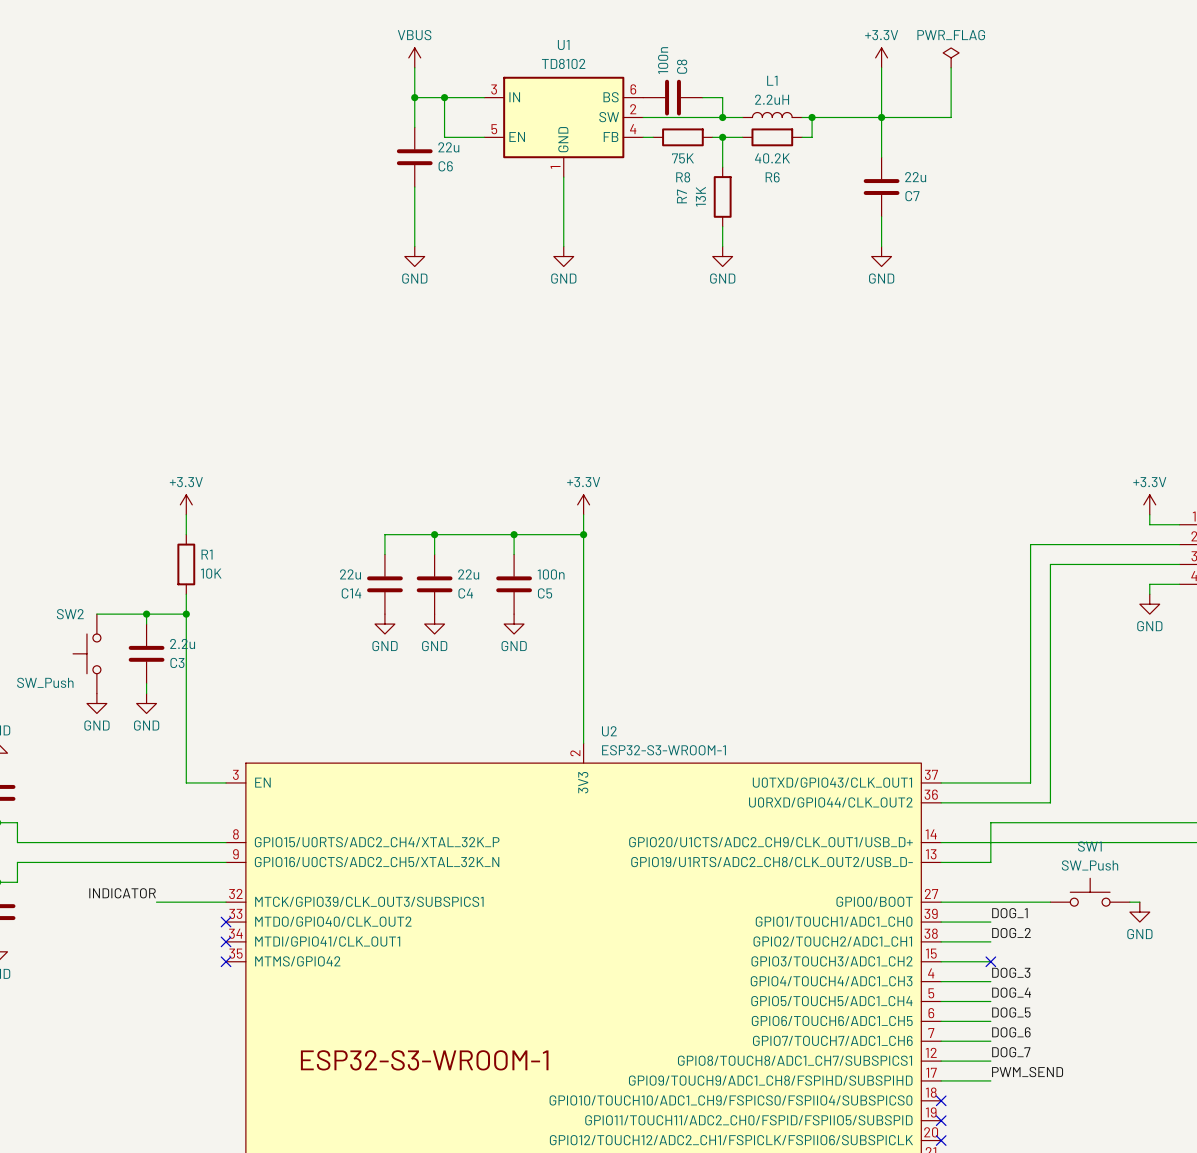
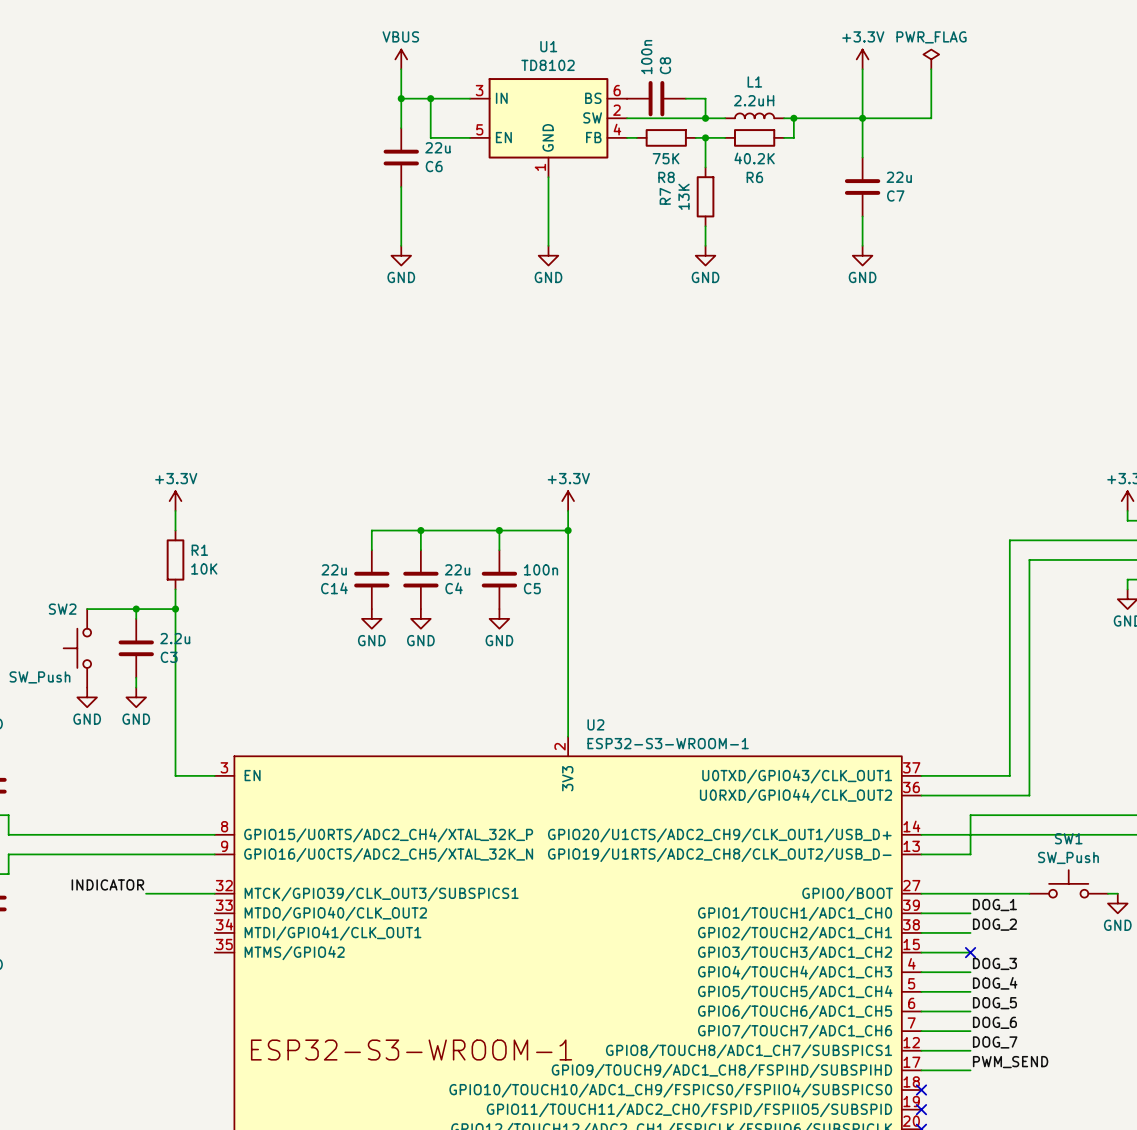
no-connect mark: (226, 922) -> none
no-connect mark: (226, 941) -> none
no-connect mark: (226, 961) -> none

